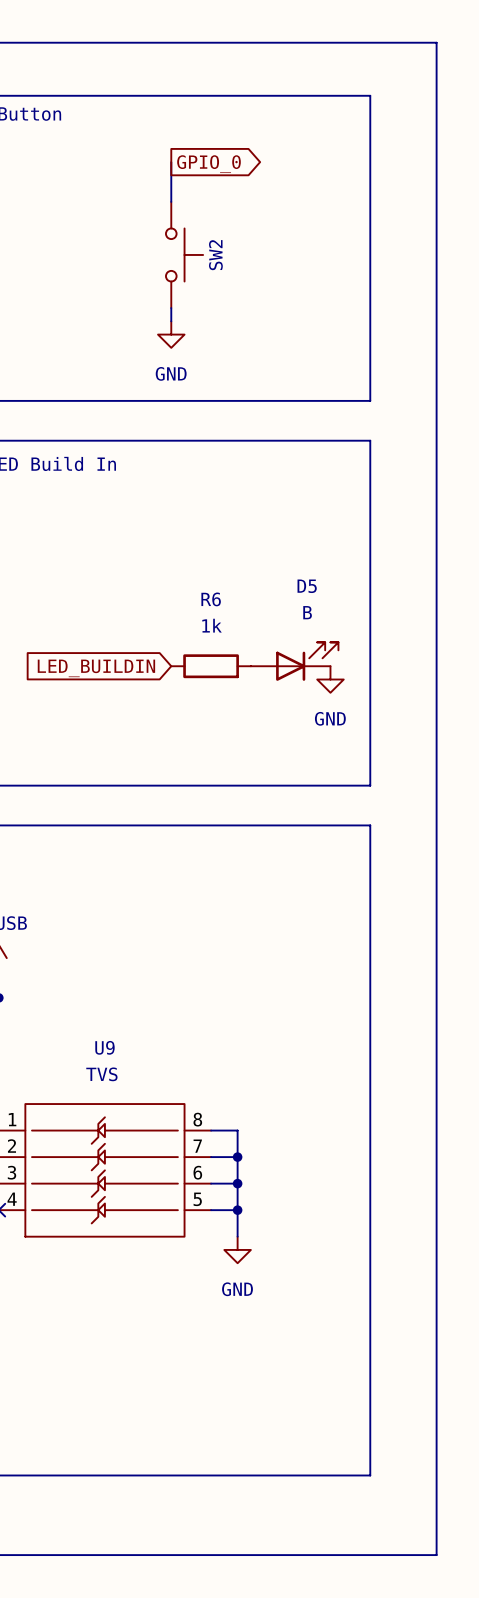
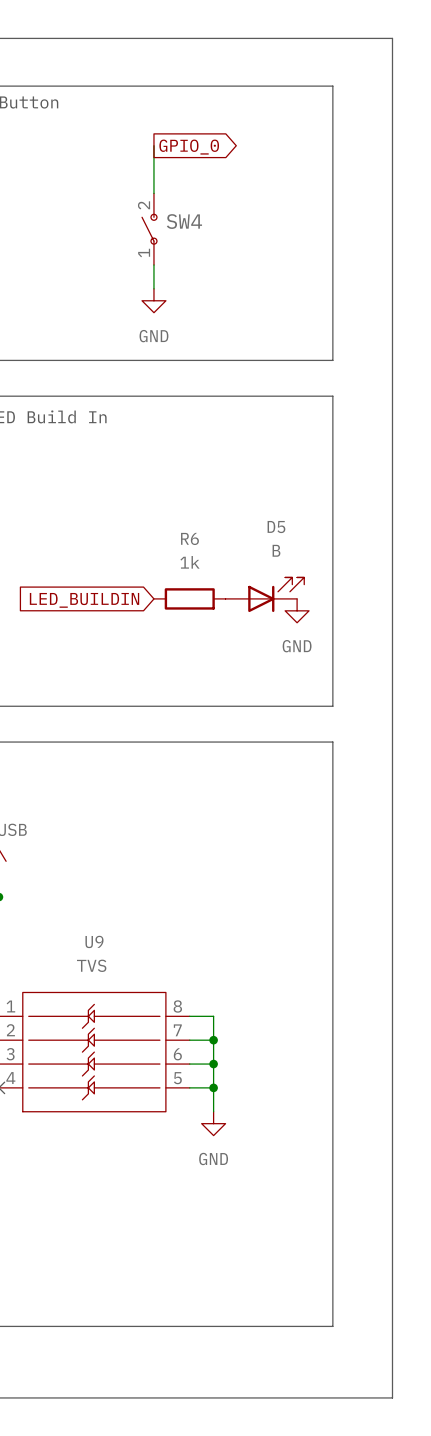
SW4: none -> (149, 229)
SW2: (184, 254) -> none

